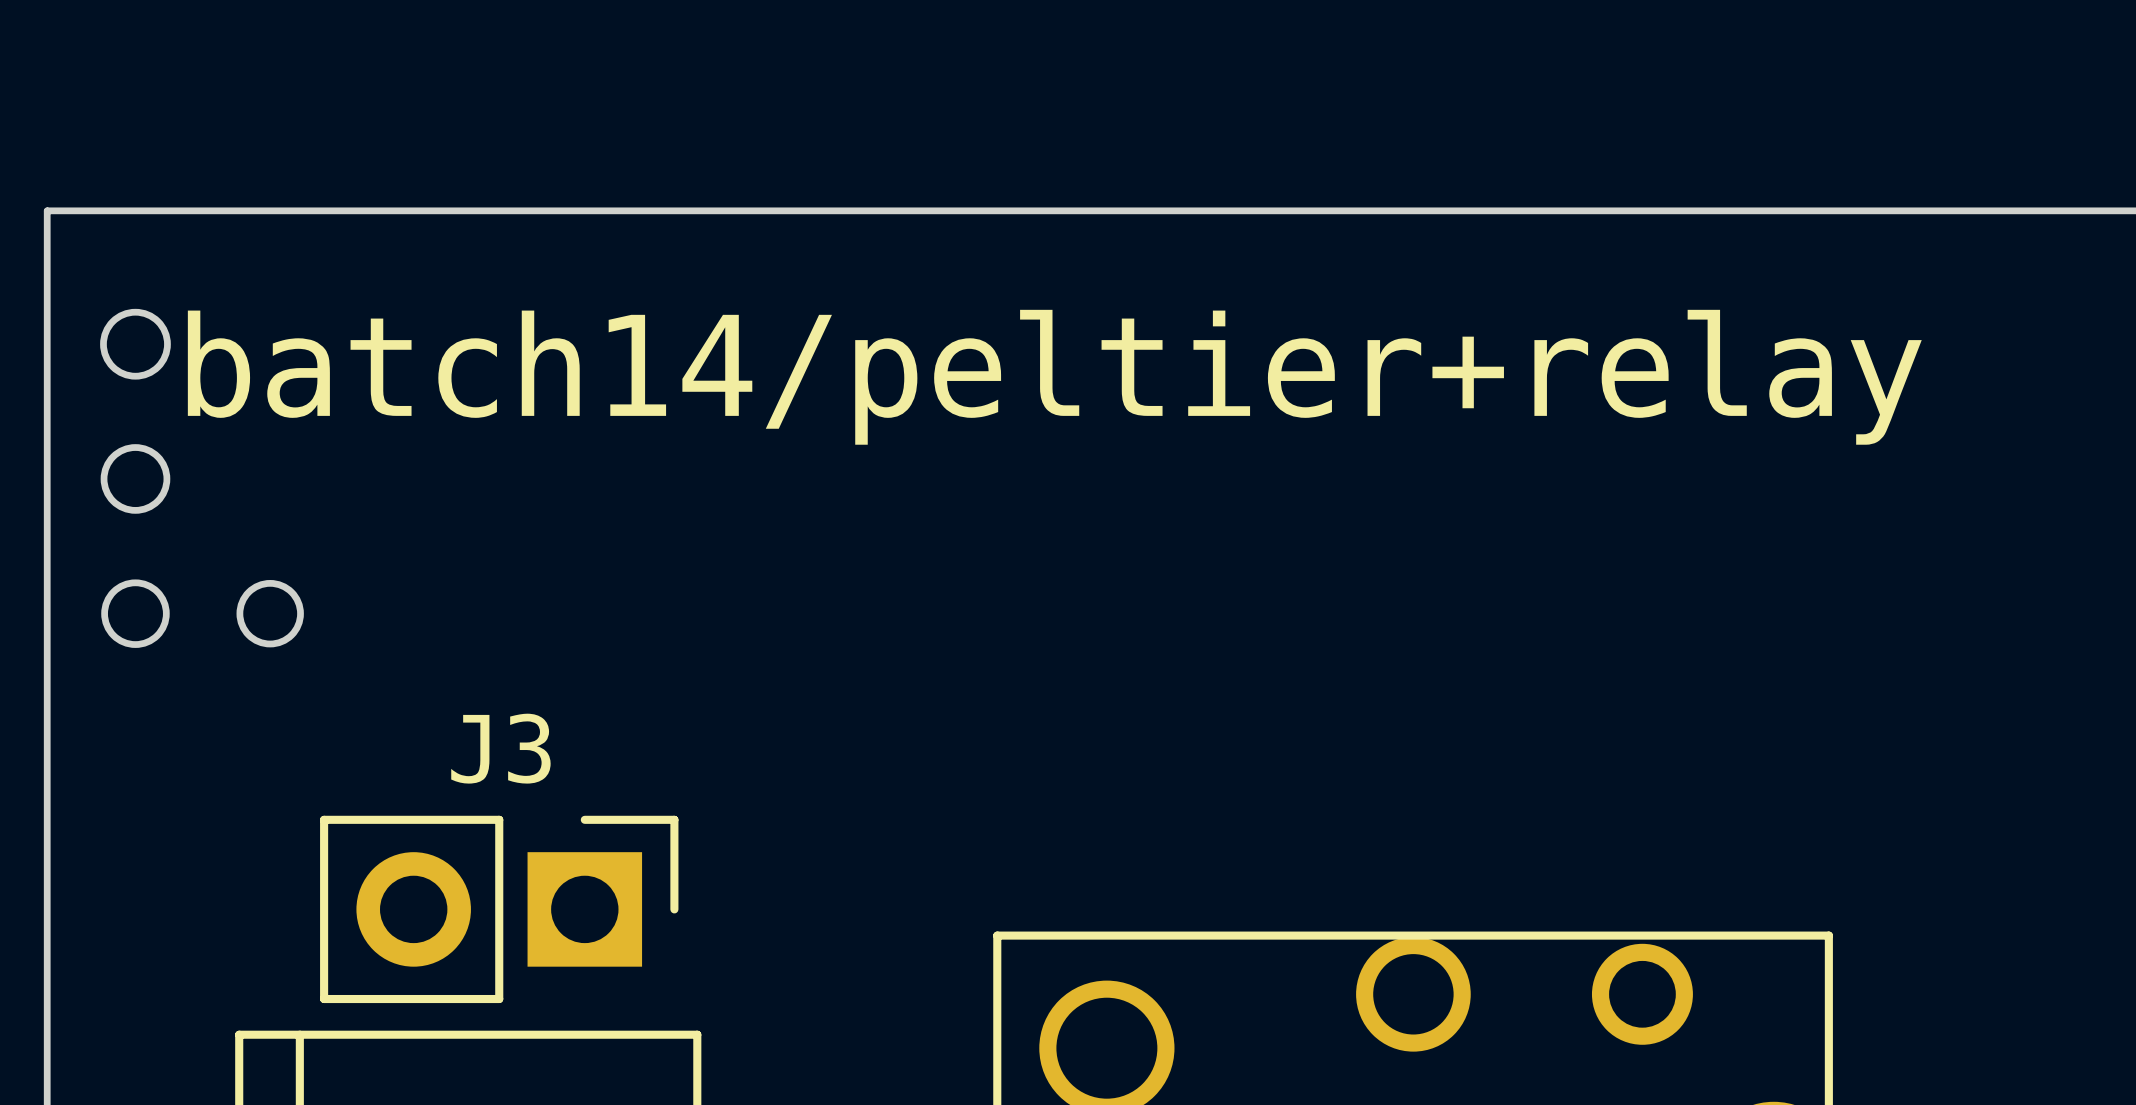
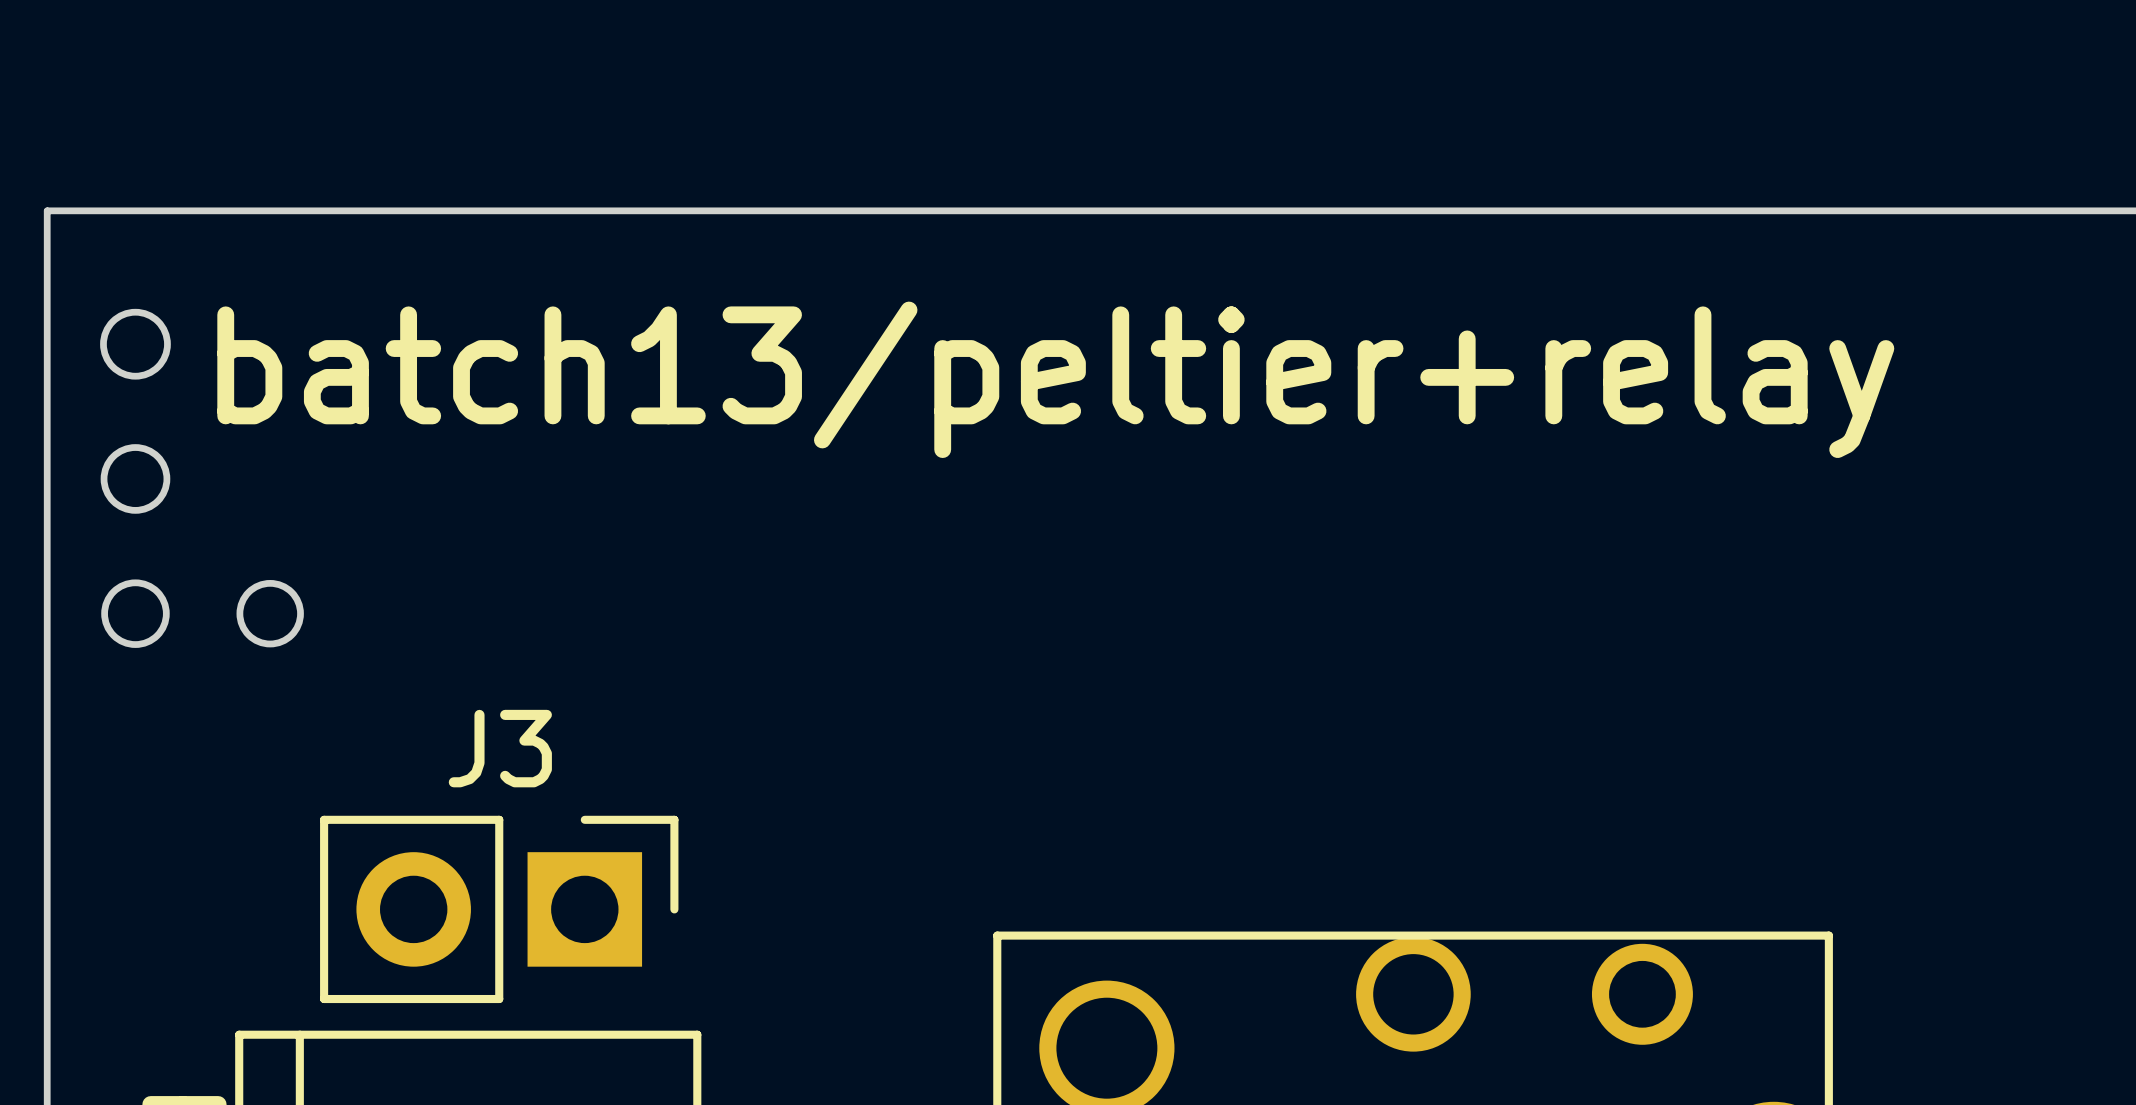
text: batch14/peltier+relay (1054, 377) -> batch13/peltier+relay (1055, 379)

